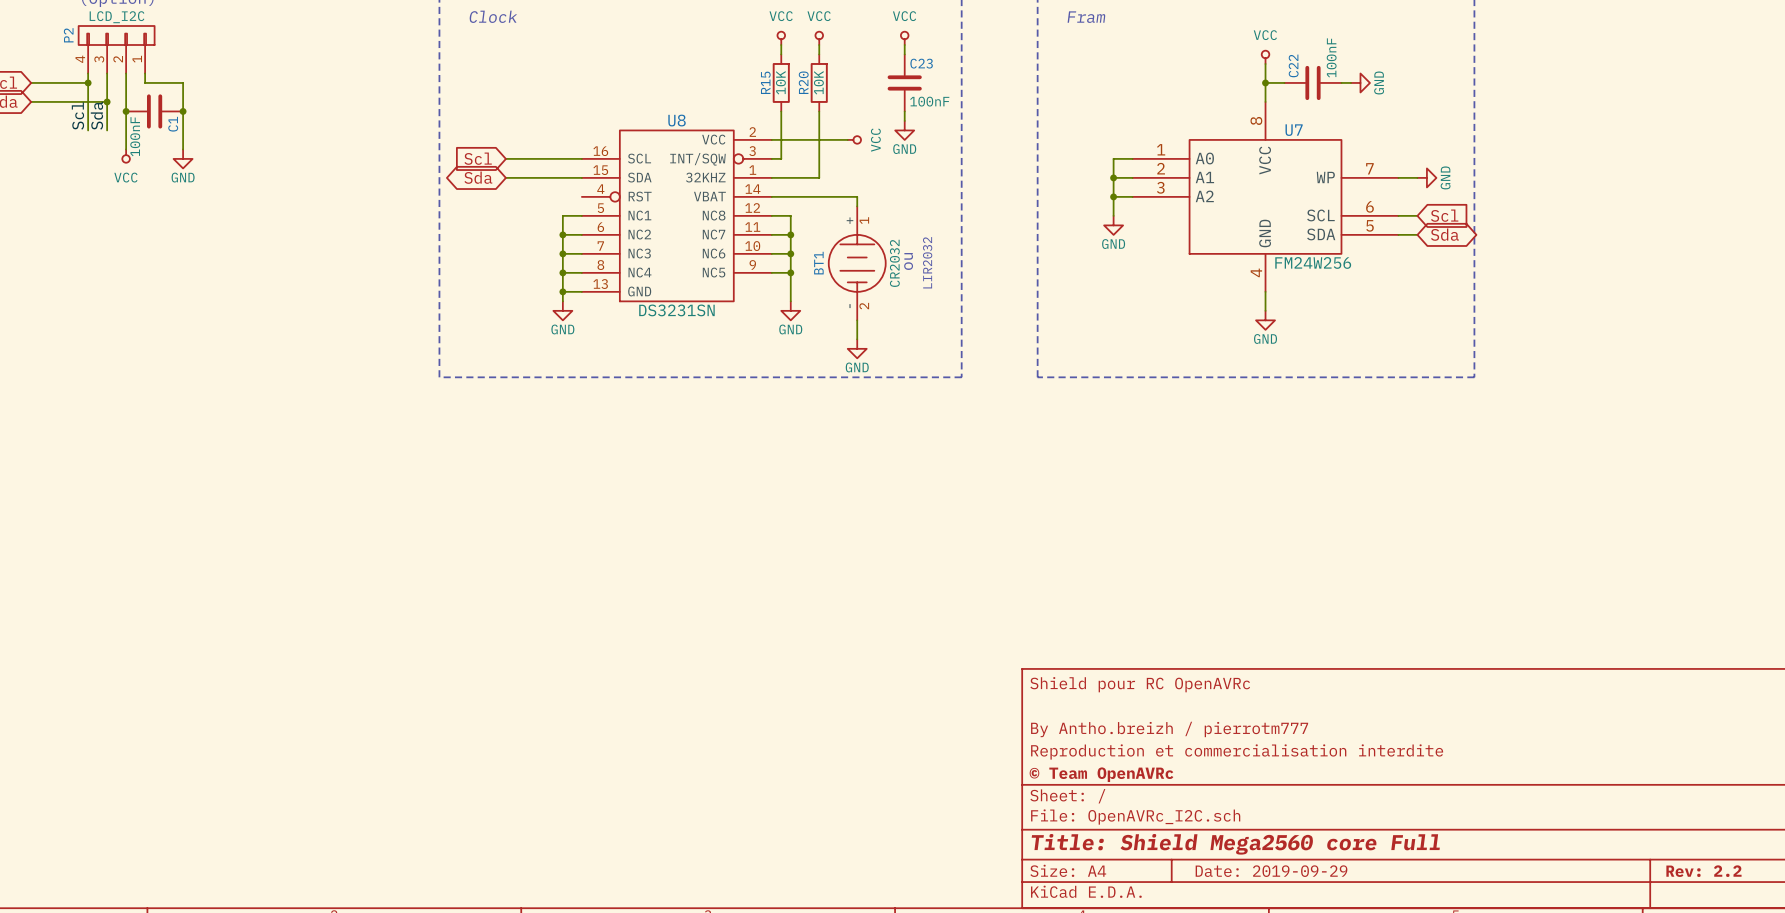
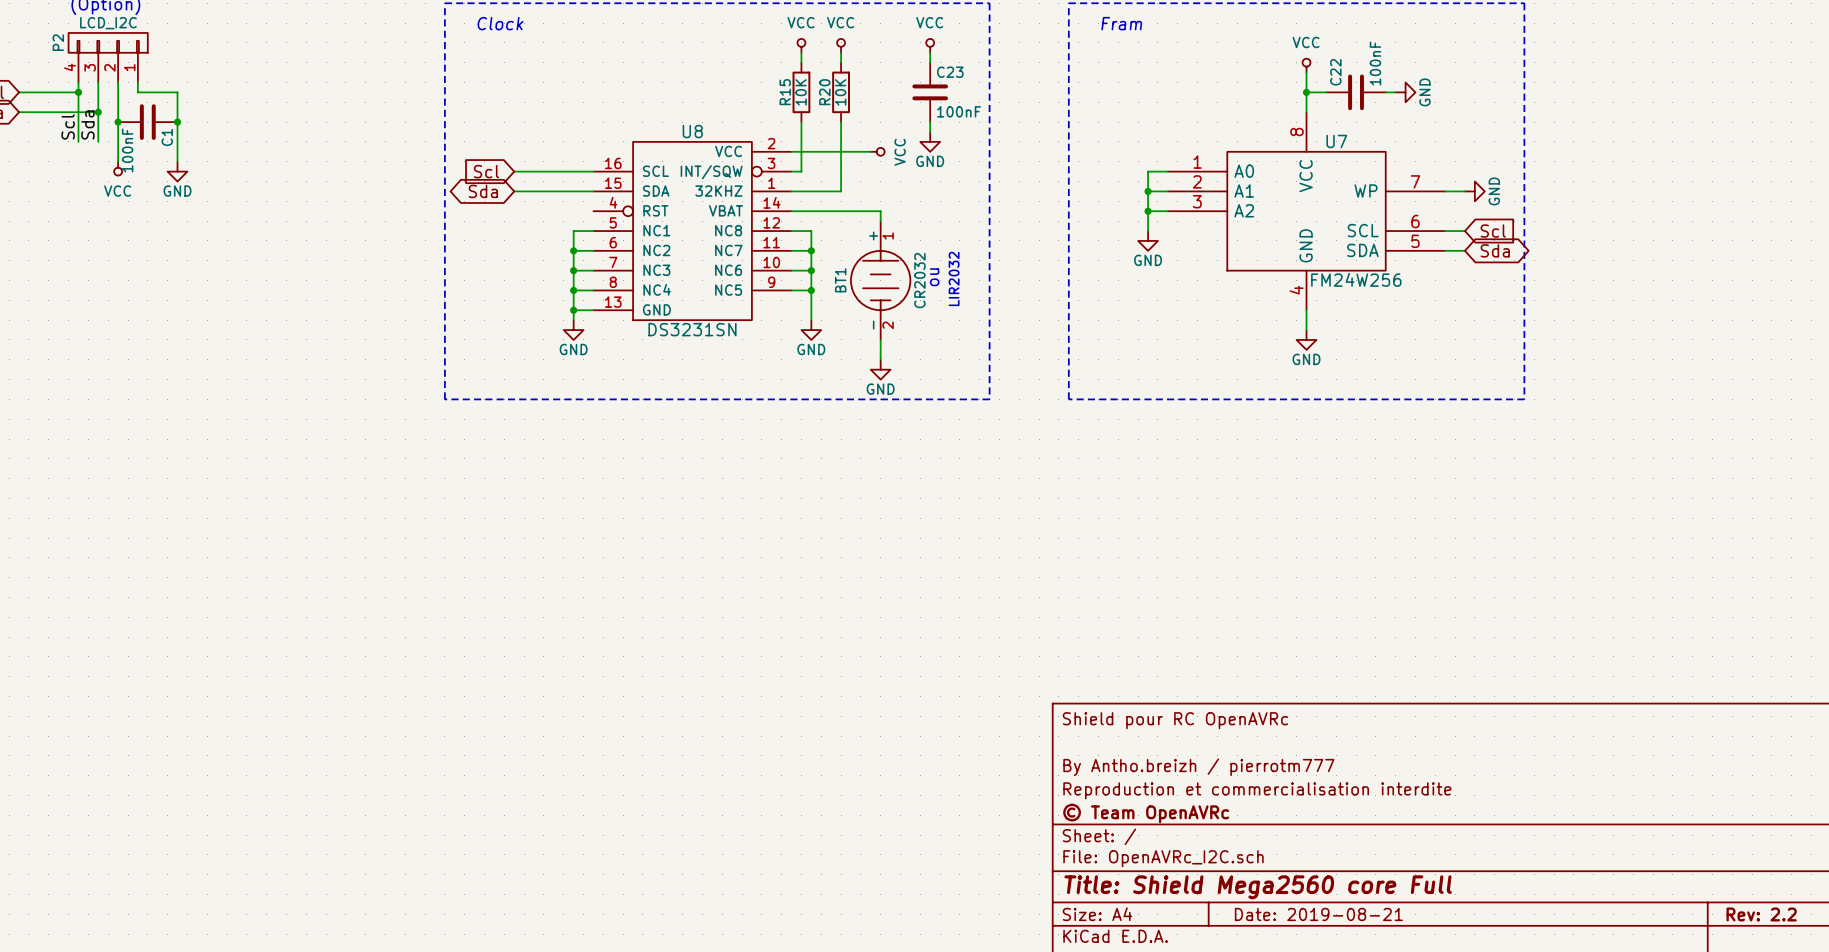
title block: Date: 2019-09-29 (1271, 871) -> Date: 2019-08-21 (1318, 914)

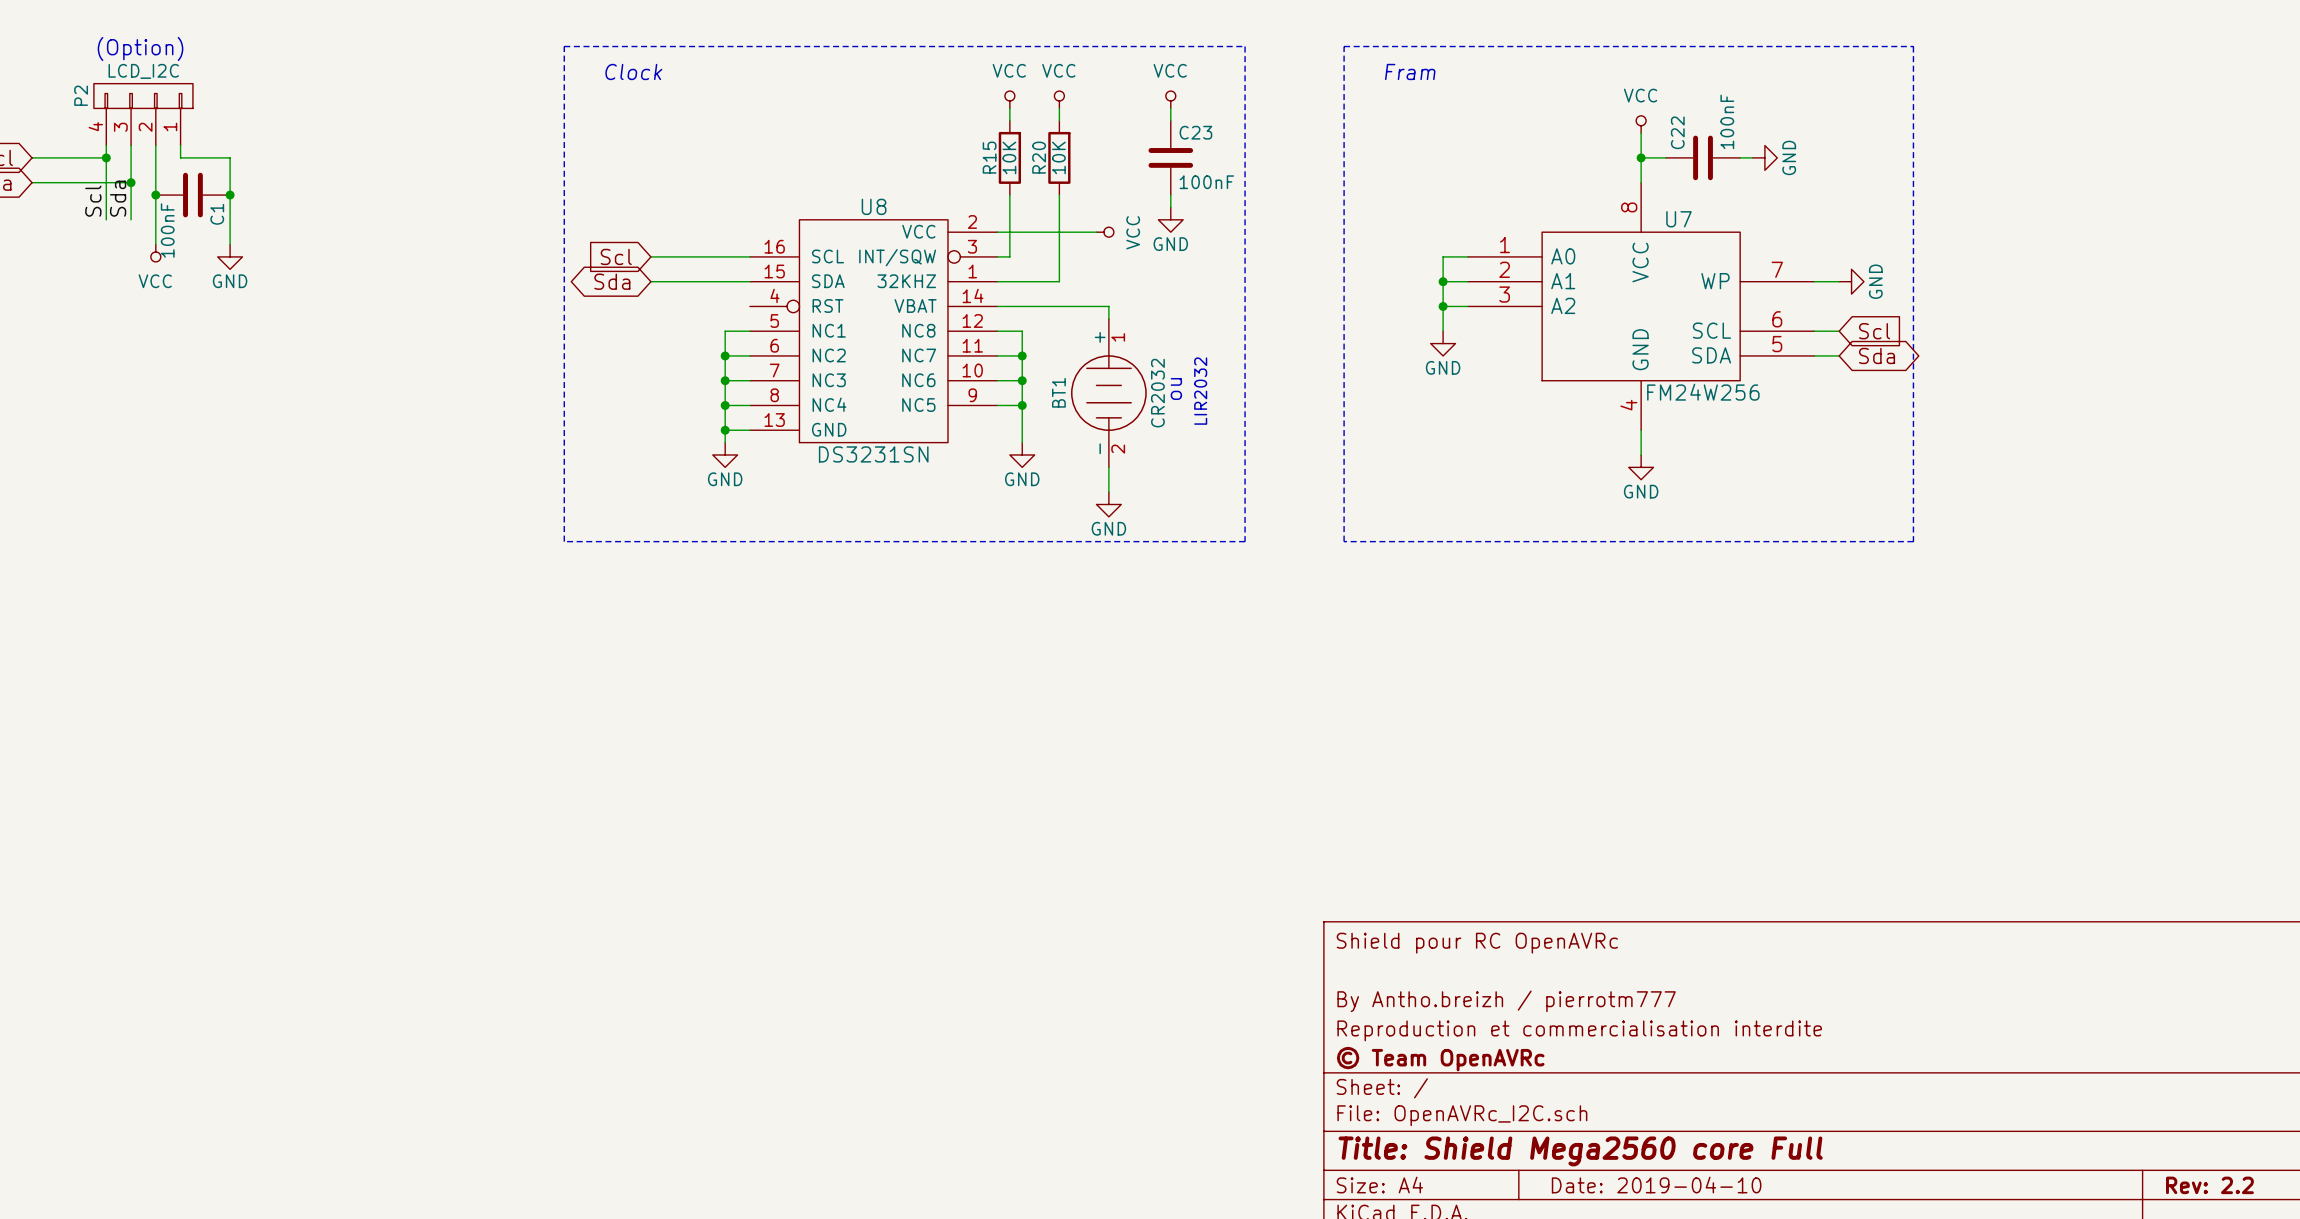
title block: Date: 2019-08-21 (1318, 914) -> Date: 2019-04-10 (1656, 1185)

